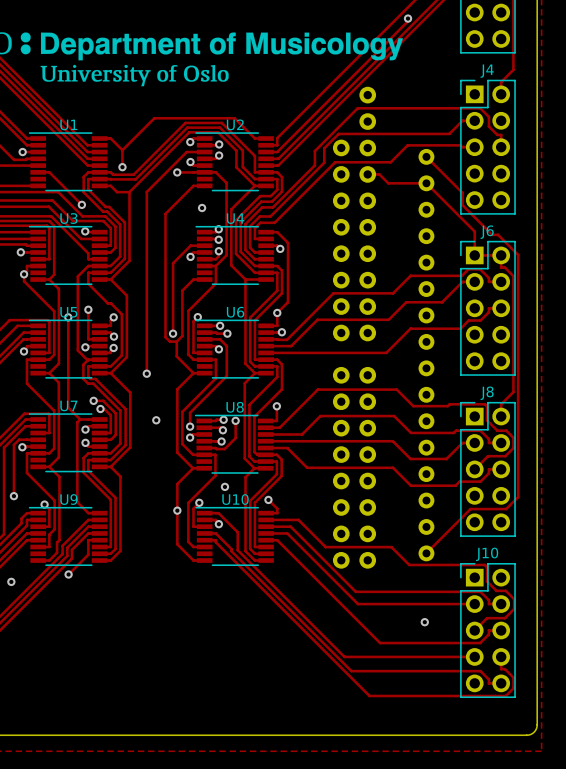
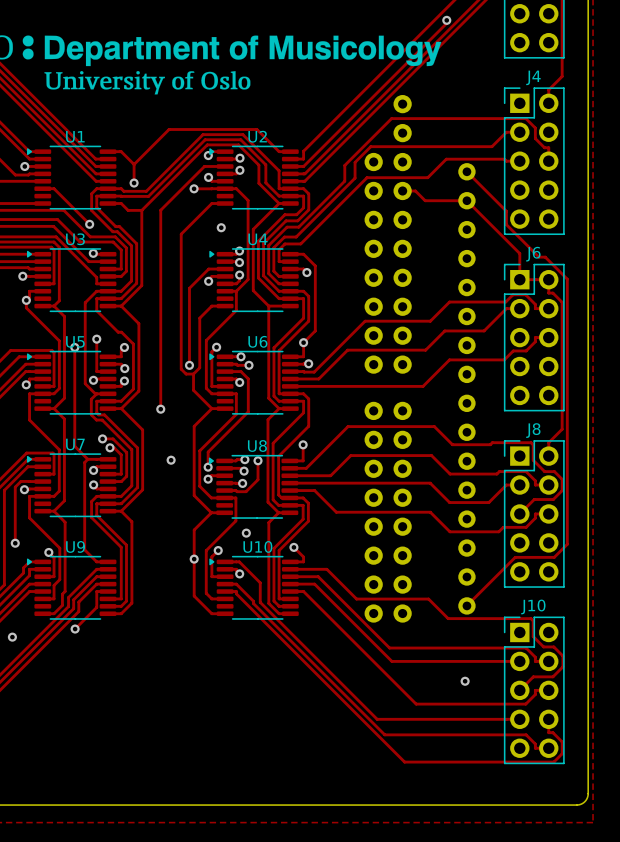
U1 footprint: [28, 132, 108, 192] -> [26, 145, 117, 210]
U2 footprint: [195, 132, 274, 192] -> [209, 145, 299, 210]
U3 footprint: [28, 225, 108, 285] -> [26, 248, 117, 313]
U4 footprint: [195, 225, 274, 285] -> [209, 248, 299, 313]
U5 footprint: [28, 319, 108, 379] -> [26, 350, 117, 415]
U6 footprint: [195, 319, 274, 379] -> [209, 350, 299, 415]
U7 footprint: [28, 413, 108, 473] -> [26, 453, 117, 518]
U8 footprint: [194, 414, 274, 474] -> [208, 455, 299, 519]
U9 footprint: [28, 506, 108, 566] -> [26, 555, 117, 620]
U10 footprint: [195, 506, 274, 566] -> [209, 555, 299, 620]

